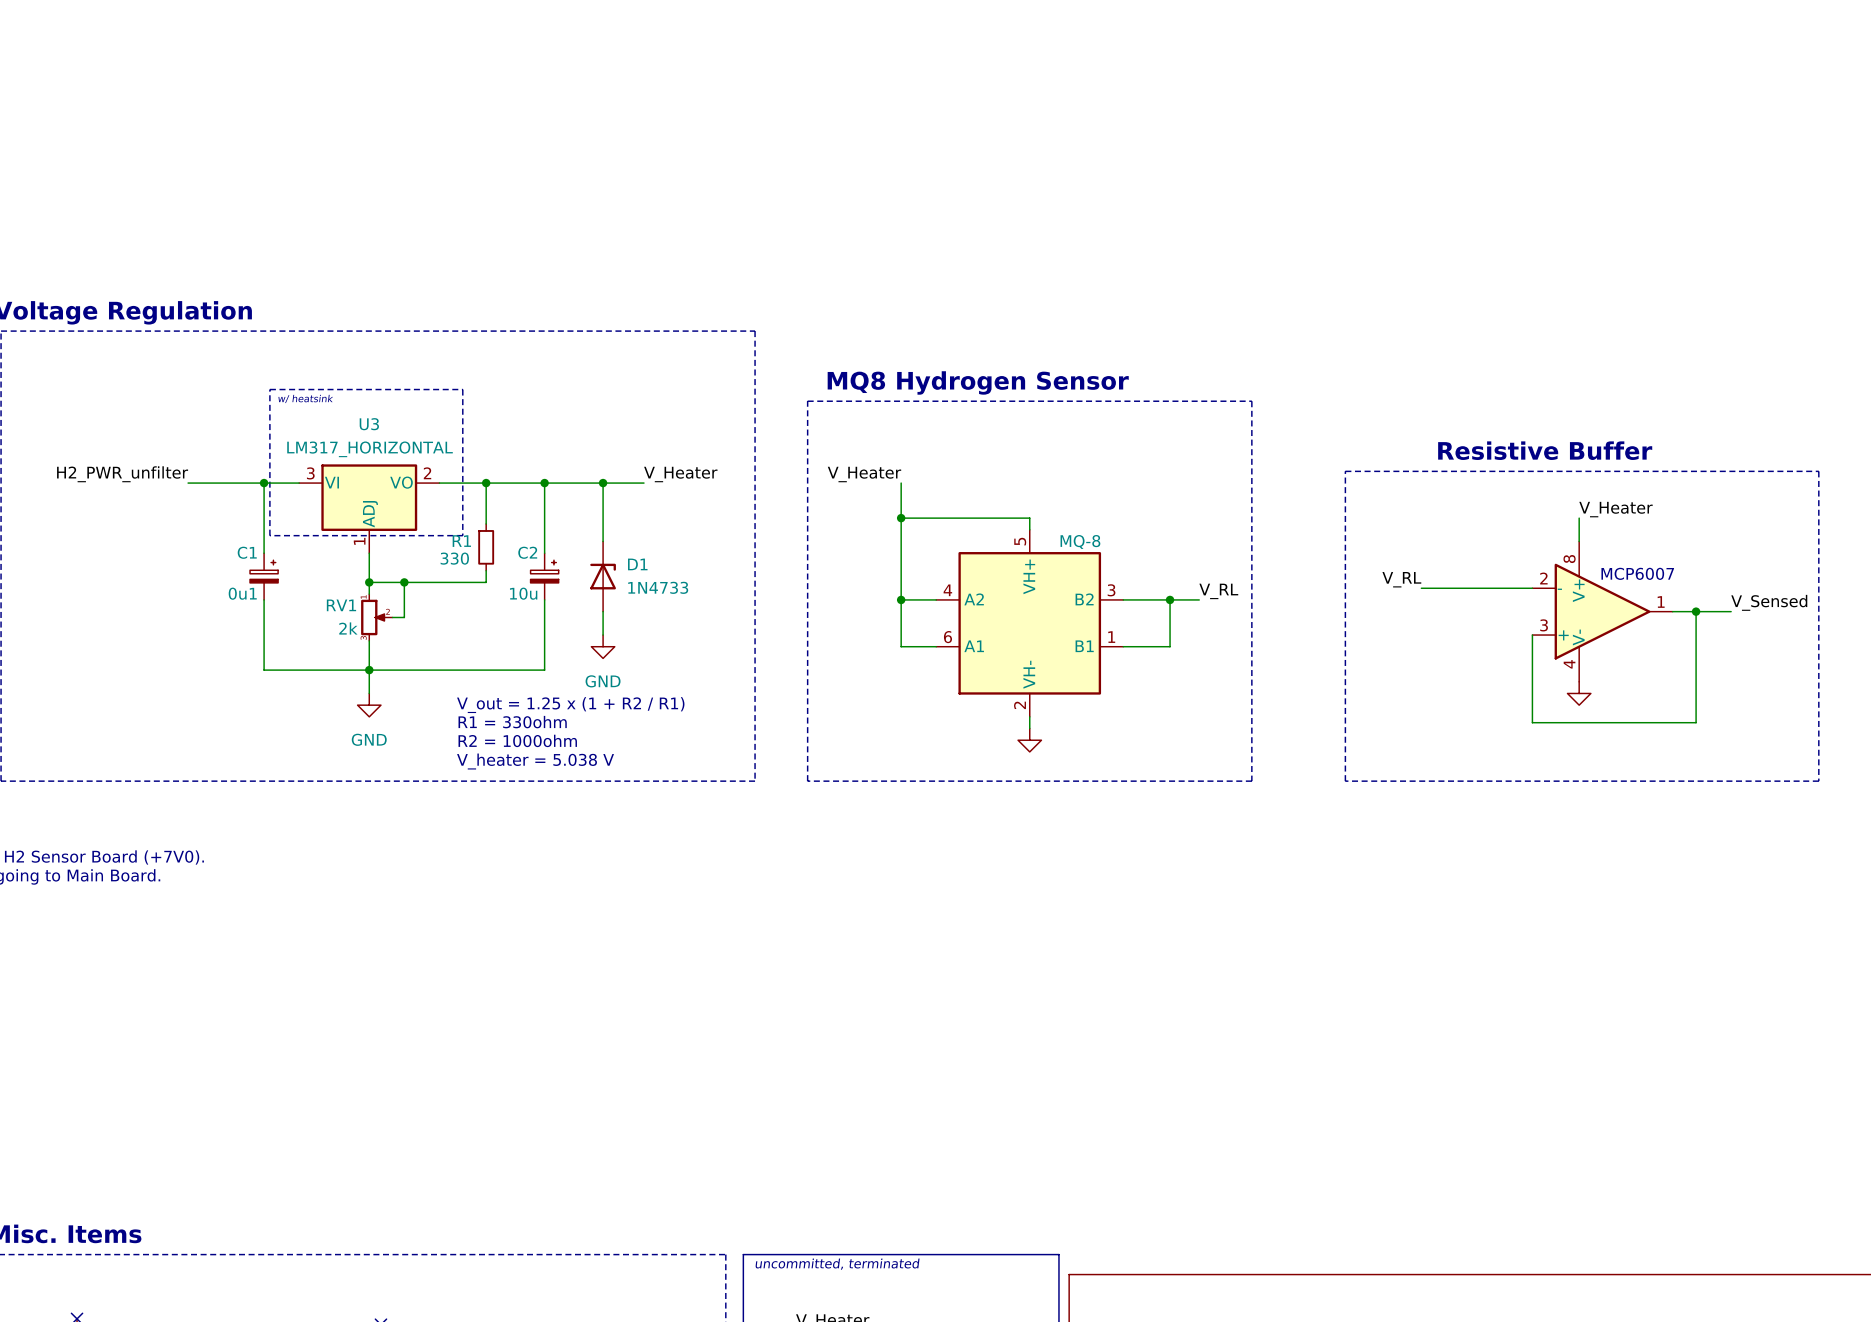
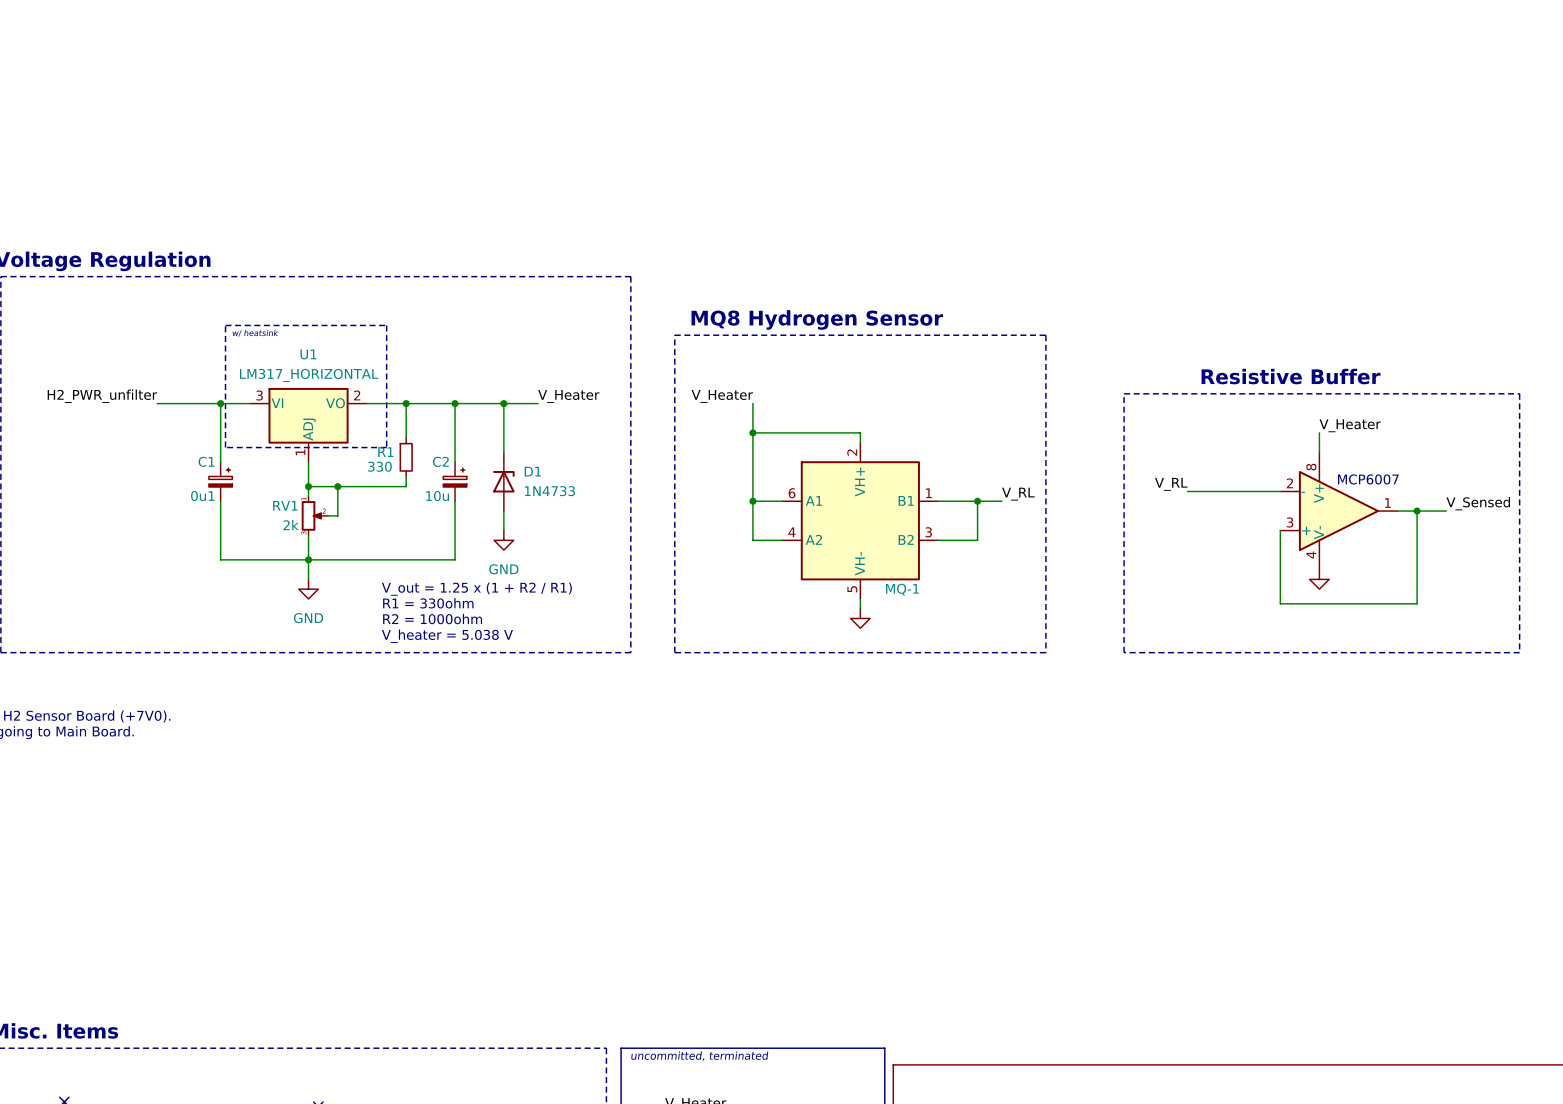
U3 name: U3 (369, 424) -> U1 (308, 354)
MQ-8 symbol: [936, 529, 1124, 717] -> [782, 442, 939, 599]
MQ-8 name: MQ-8 (1080, 541) -> MQ-1 (902, 589)

